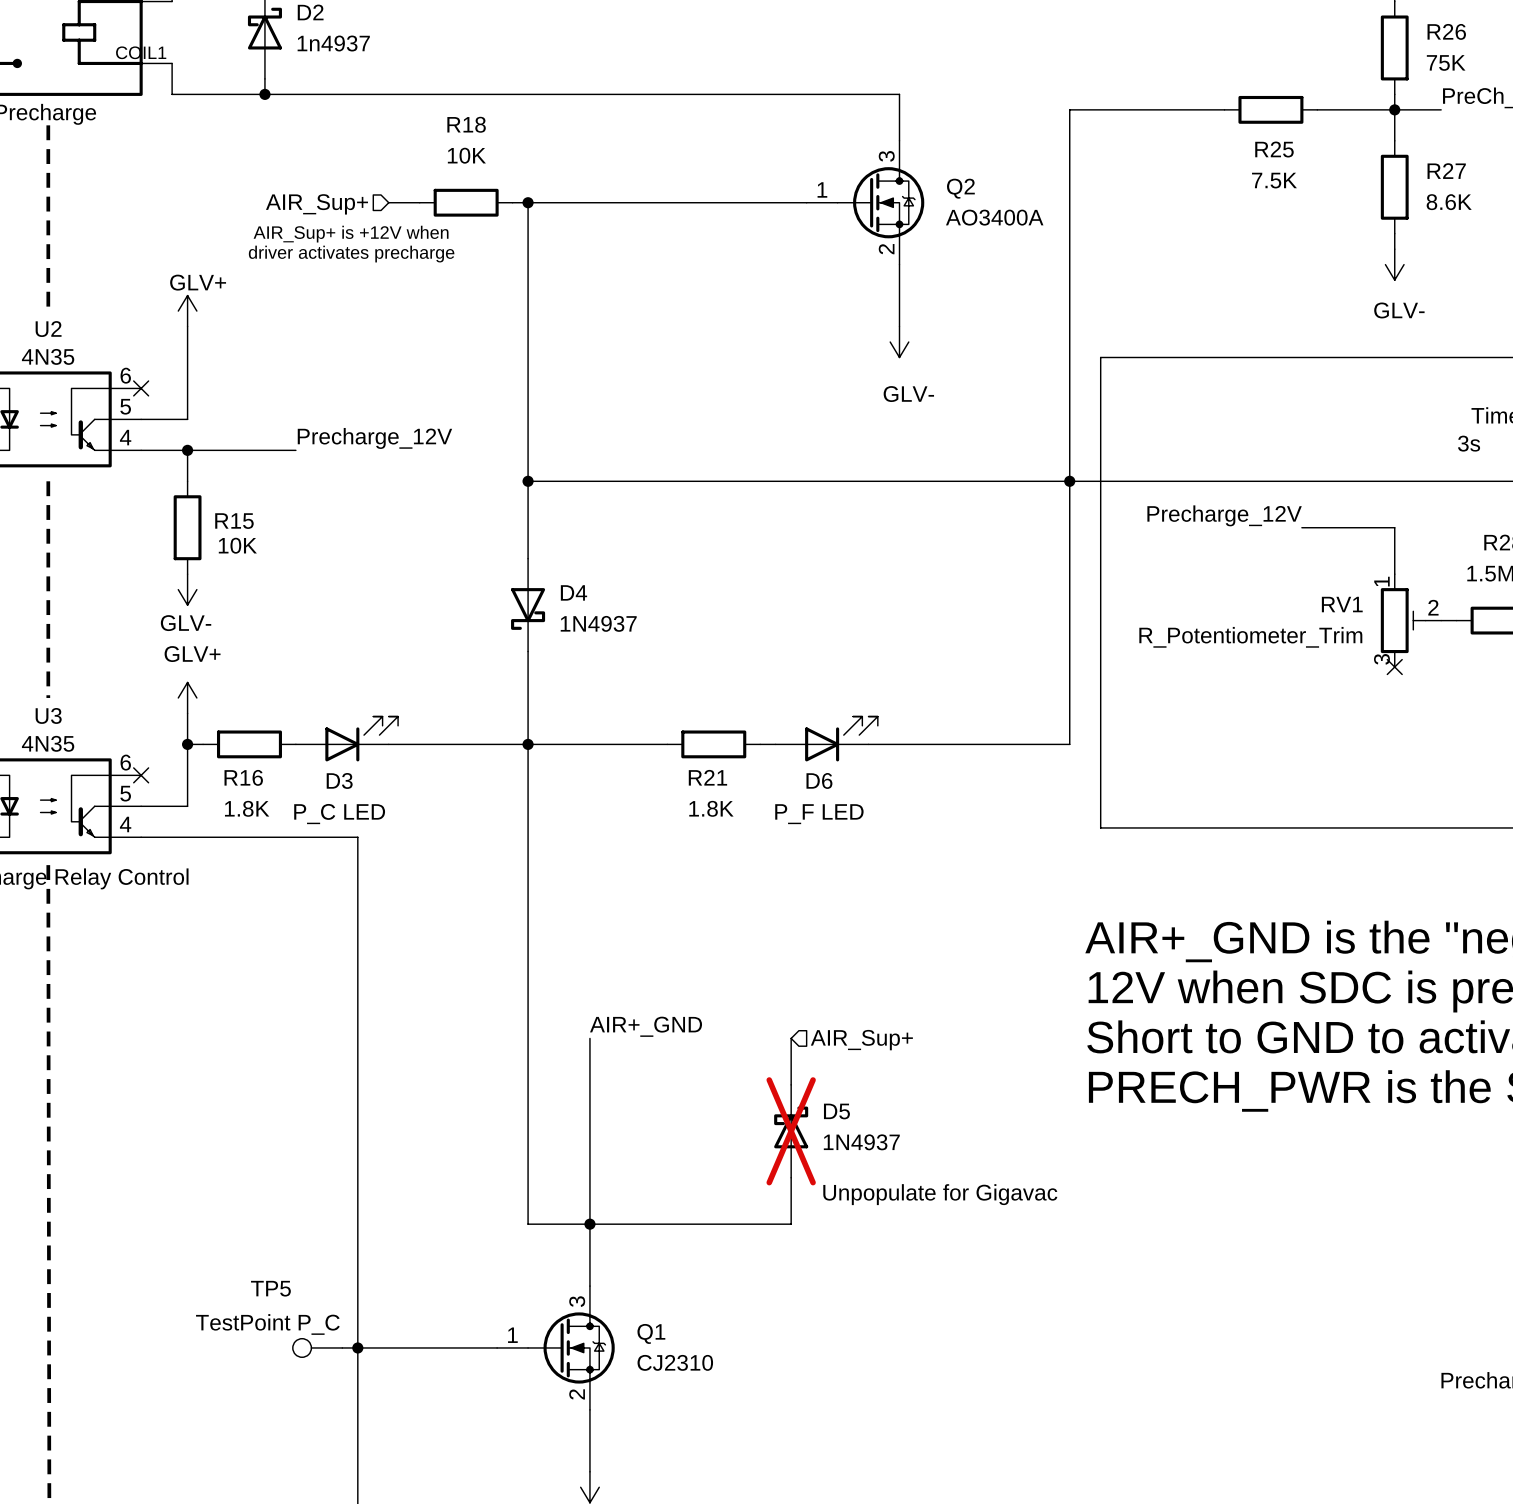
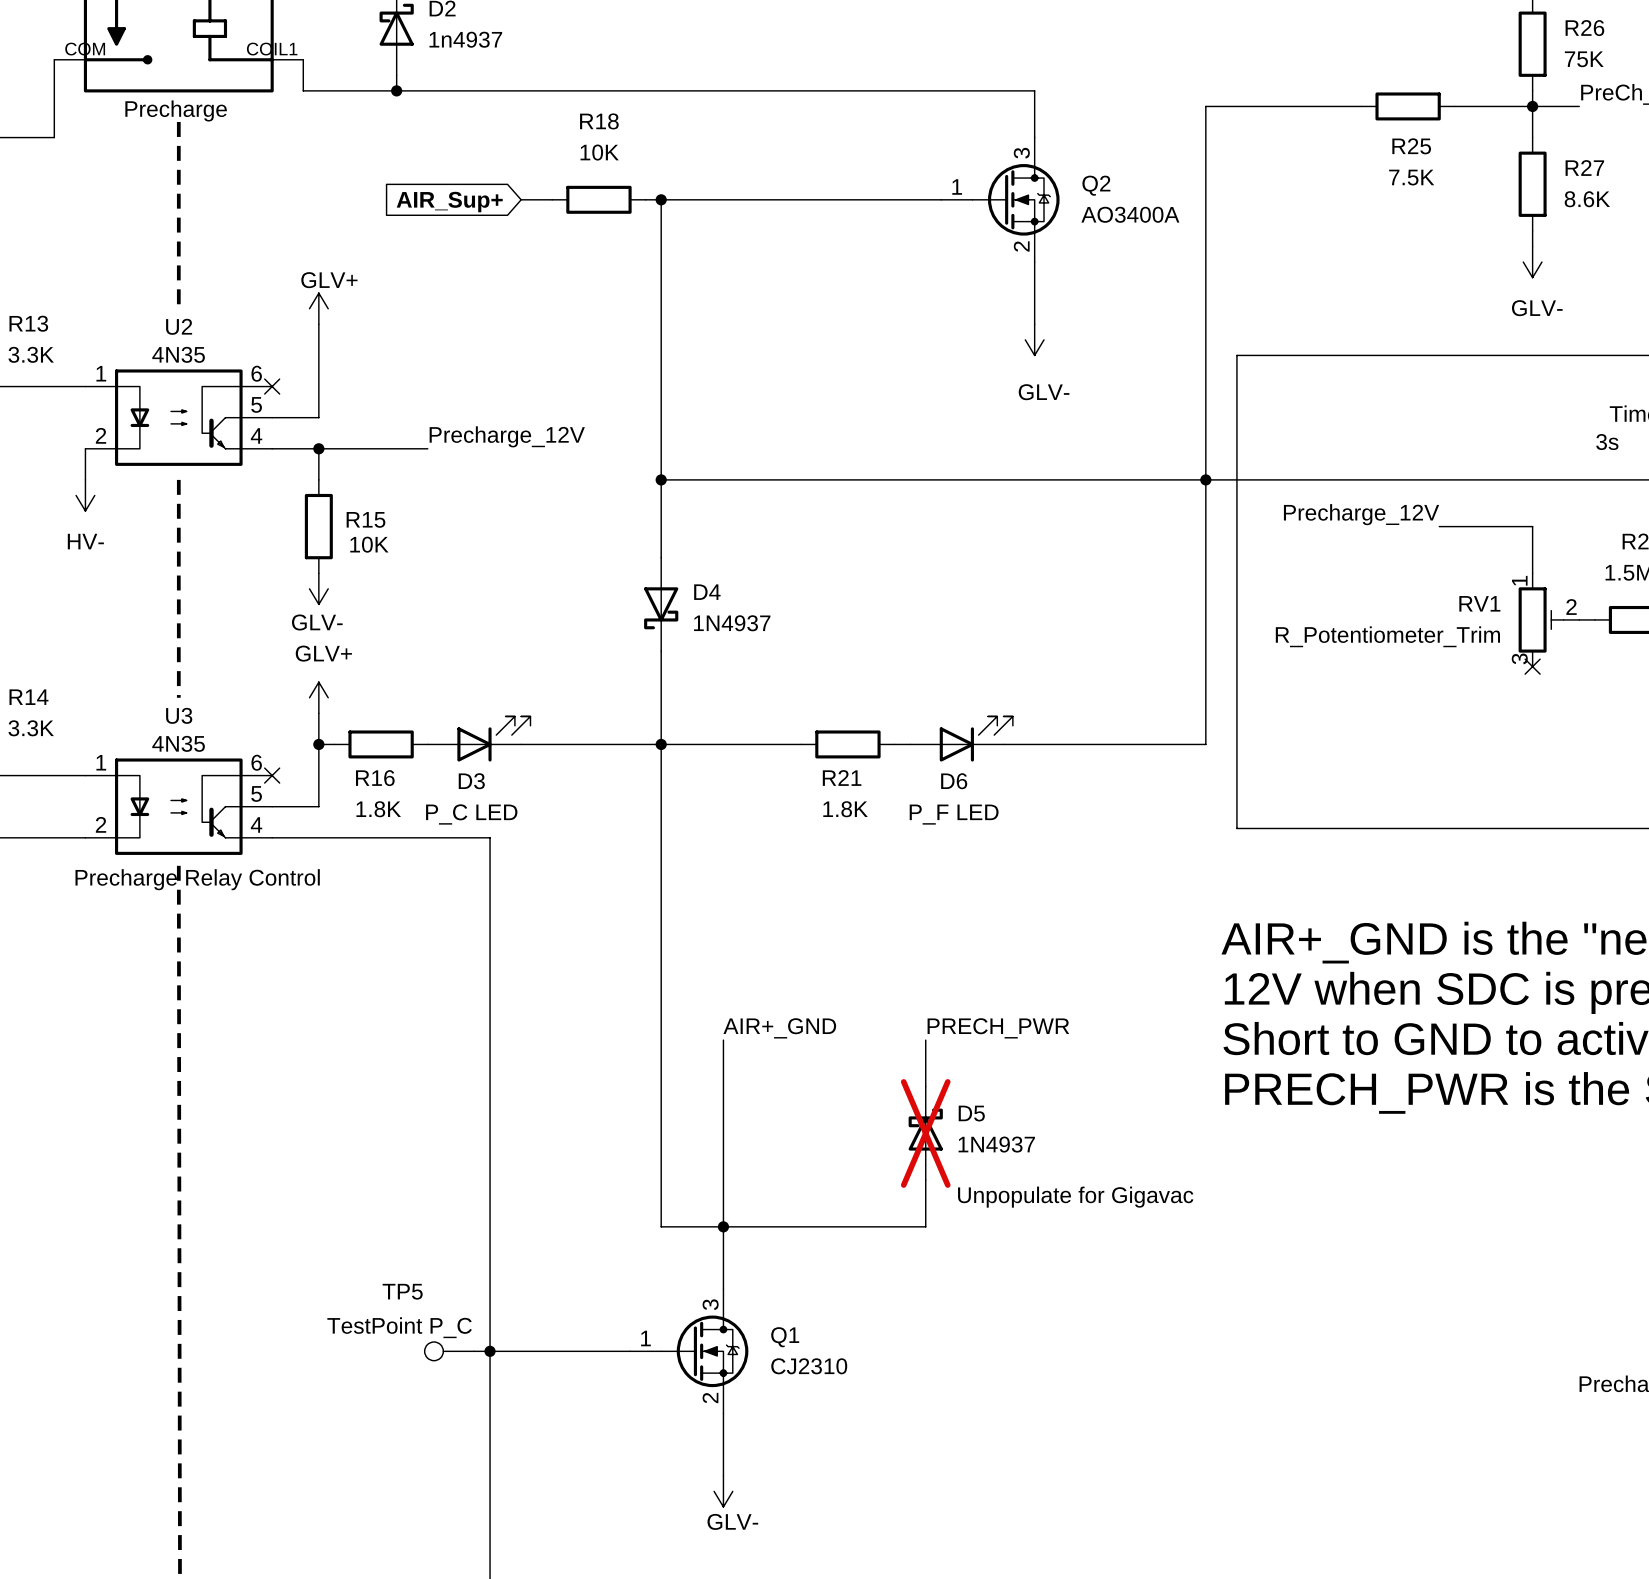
hierarchical label: AIR_Sup+ (317, 204) -> none
global label: none -> AIR_Sup+ (449, 202)
text: AIR_Sup+ is +12V when (351, 234) -> none
text: driver activates precharge (351, 254) -> none
label: none -> PRECH_PWR (998, 1028)
hierarchical label: AIR_Sup+ (861, 1040) -> none

